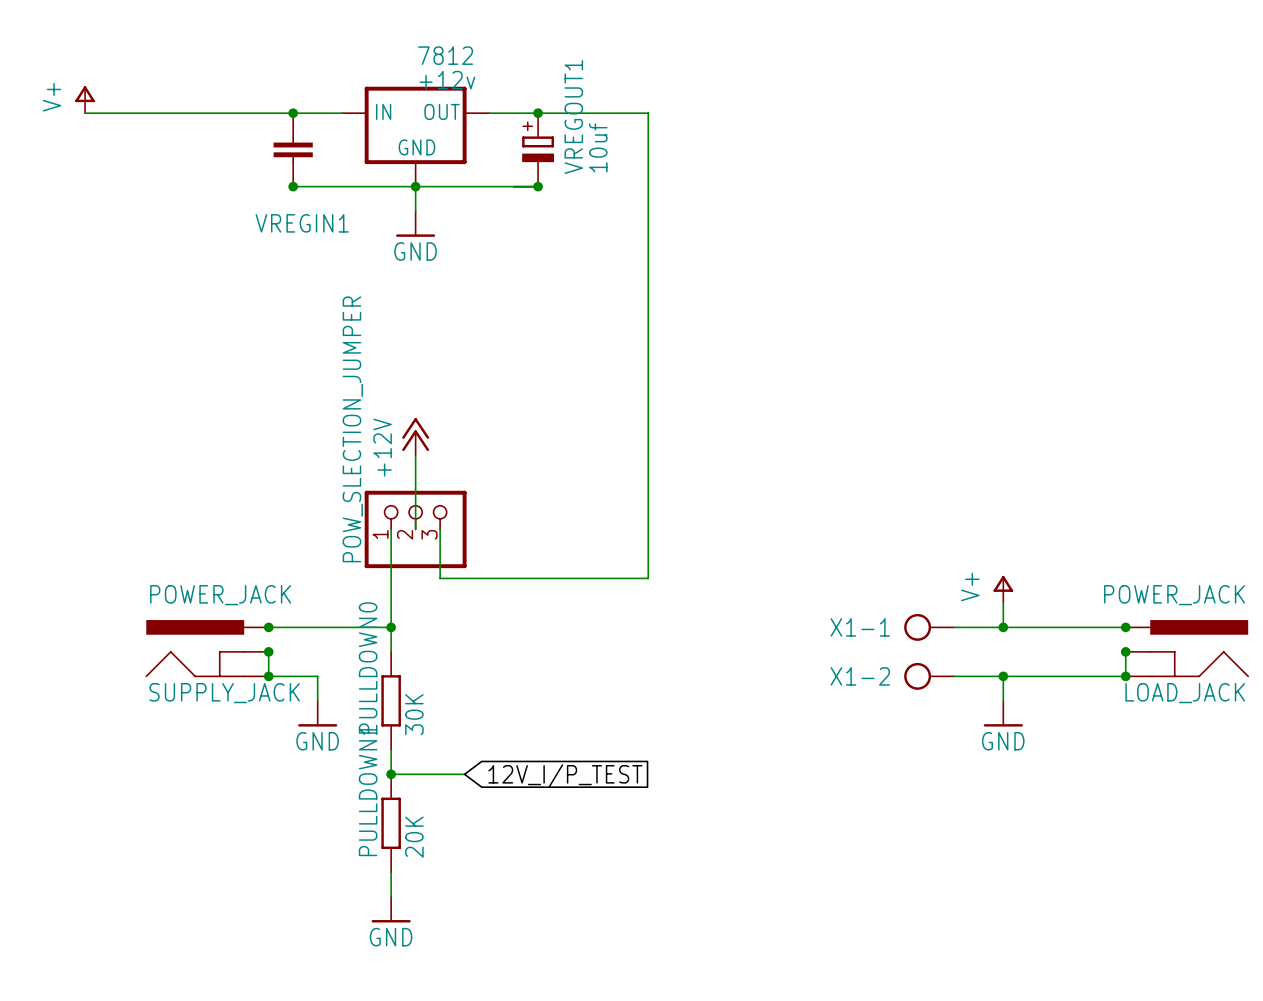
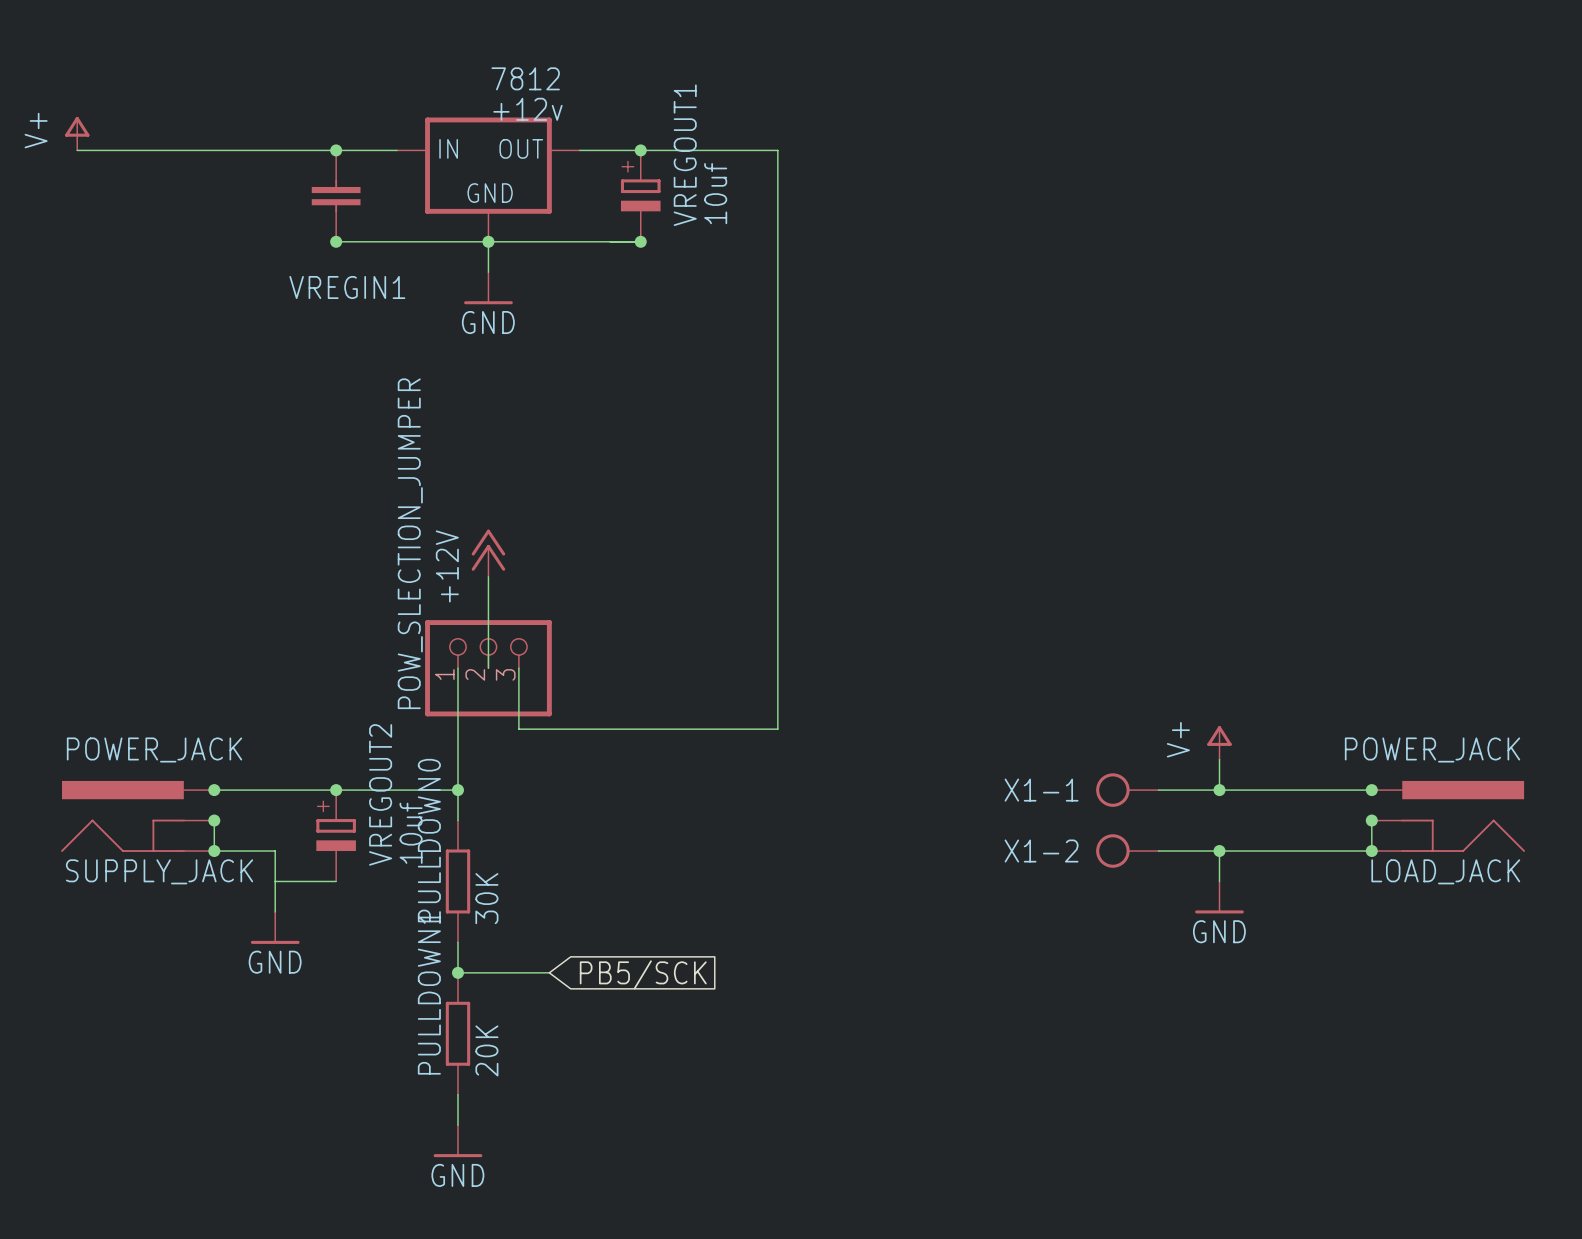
junction: none -> (214, 790)
junction: (268, 627) -> none
junction: none -> (336, 790)
SUPPLY_JACK position: (207, 648) -> (137, 816)
wire: none -> (214, 820) (214, 851) (275, 851) (275, 911)
junction: none -> (214, 820)
wire: (268, 651) (268, 676) (317, 676) (317, 700) -> none
junction: (268, 651) -> none
VREGOUT2: none -> 10uf (336, 835)
junction: none -> (214, 851)
junction: (268, 676) -> none
wire: none -> (275, 881) (336, 881)
power symbol position: GND (317, 713) -> GND (275, 927)
global label: 12V_I/P_TEST (565, 775) -> PB5/SCK (643, 974)

